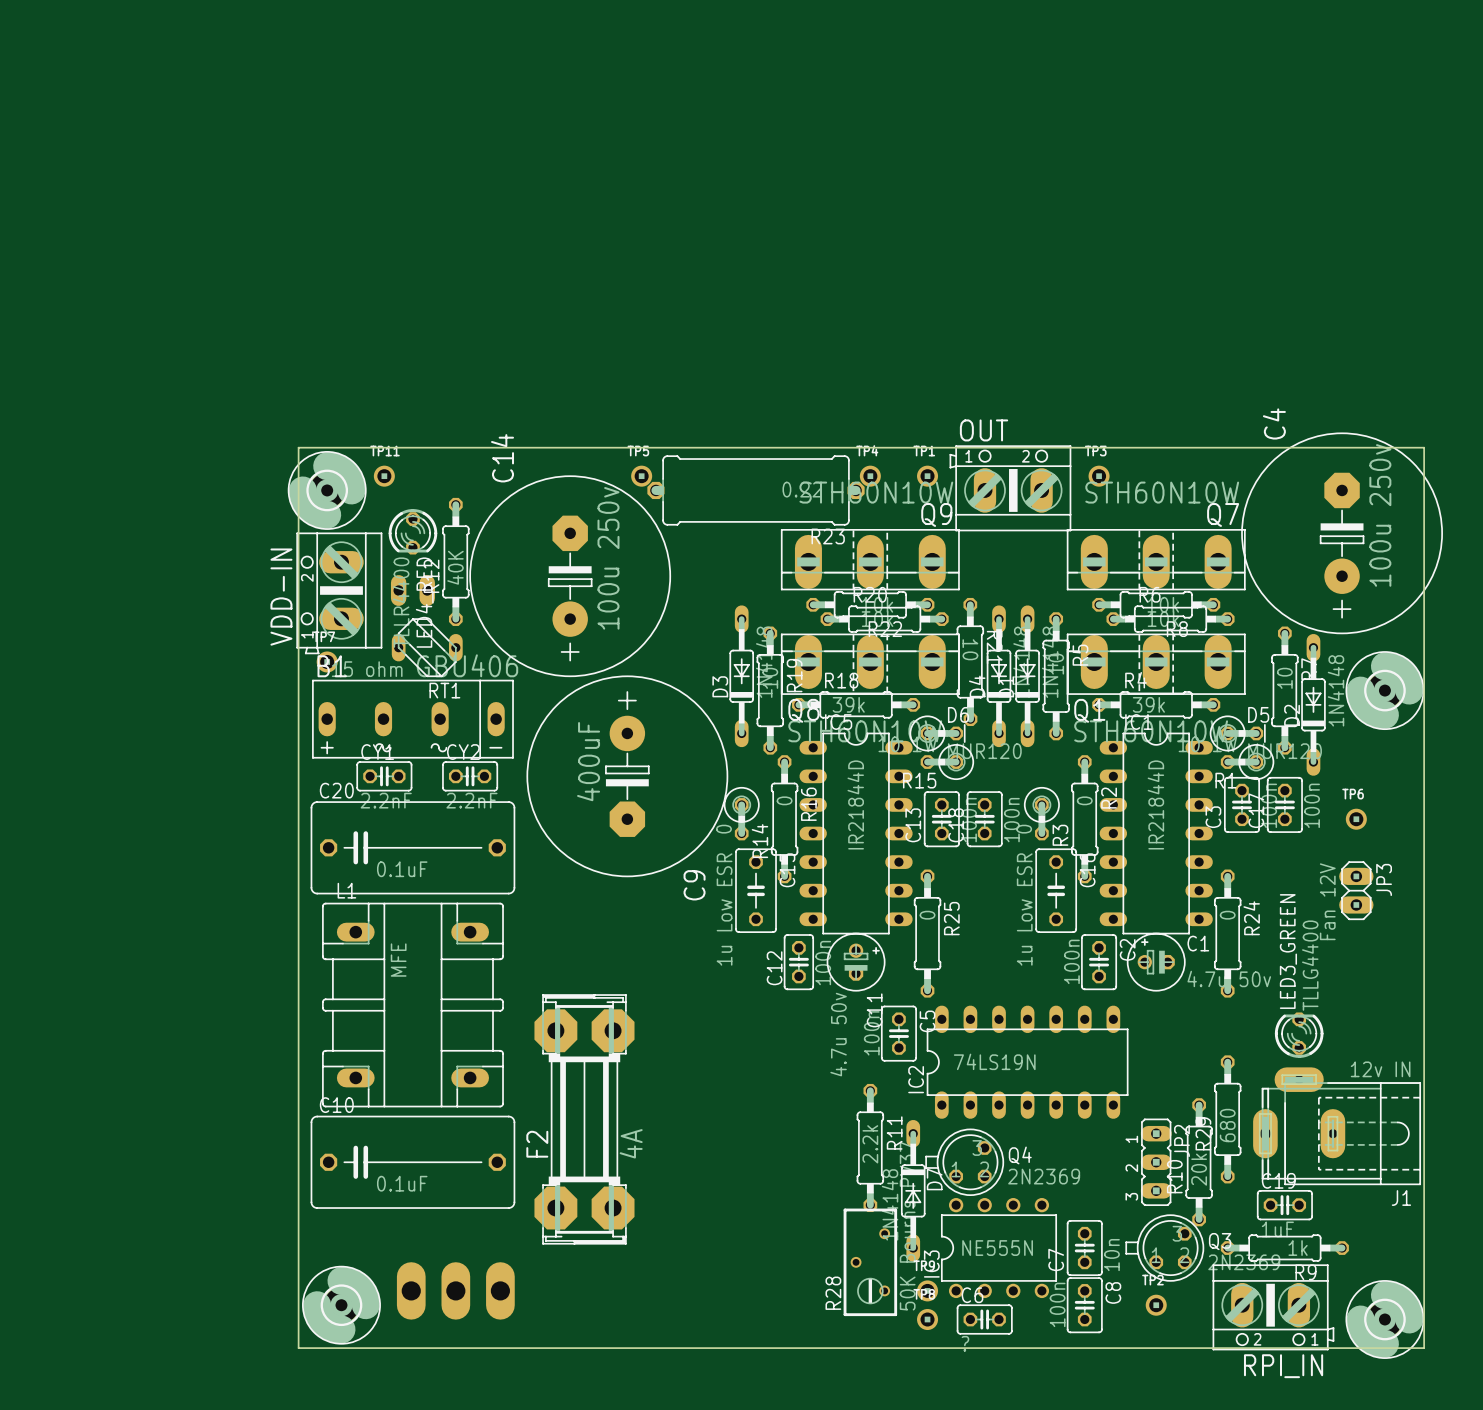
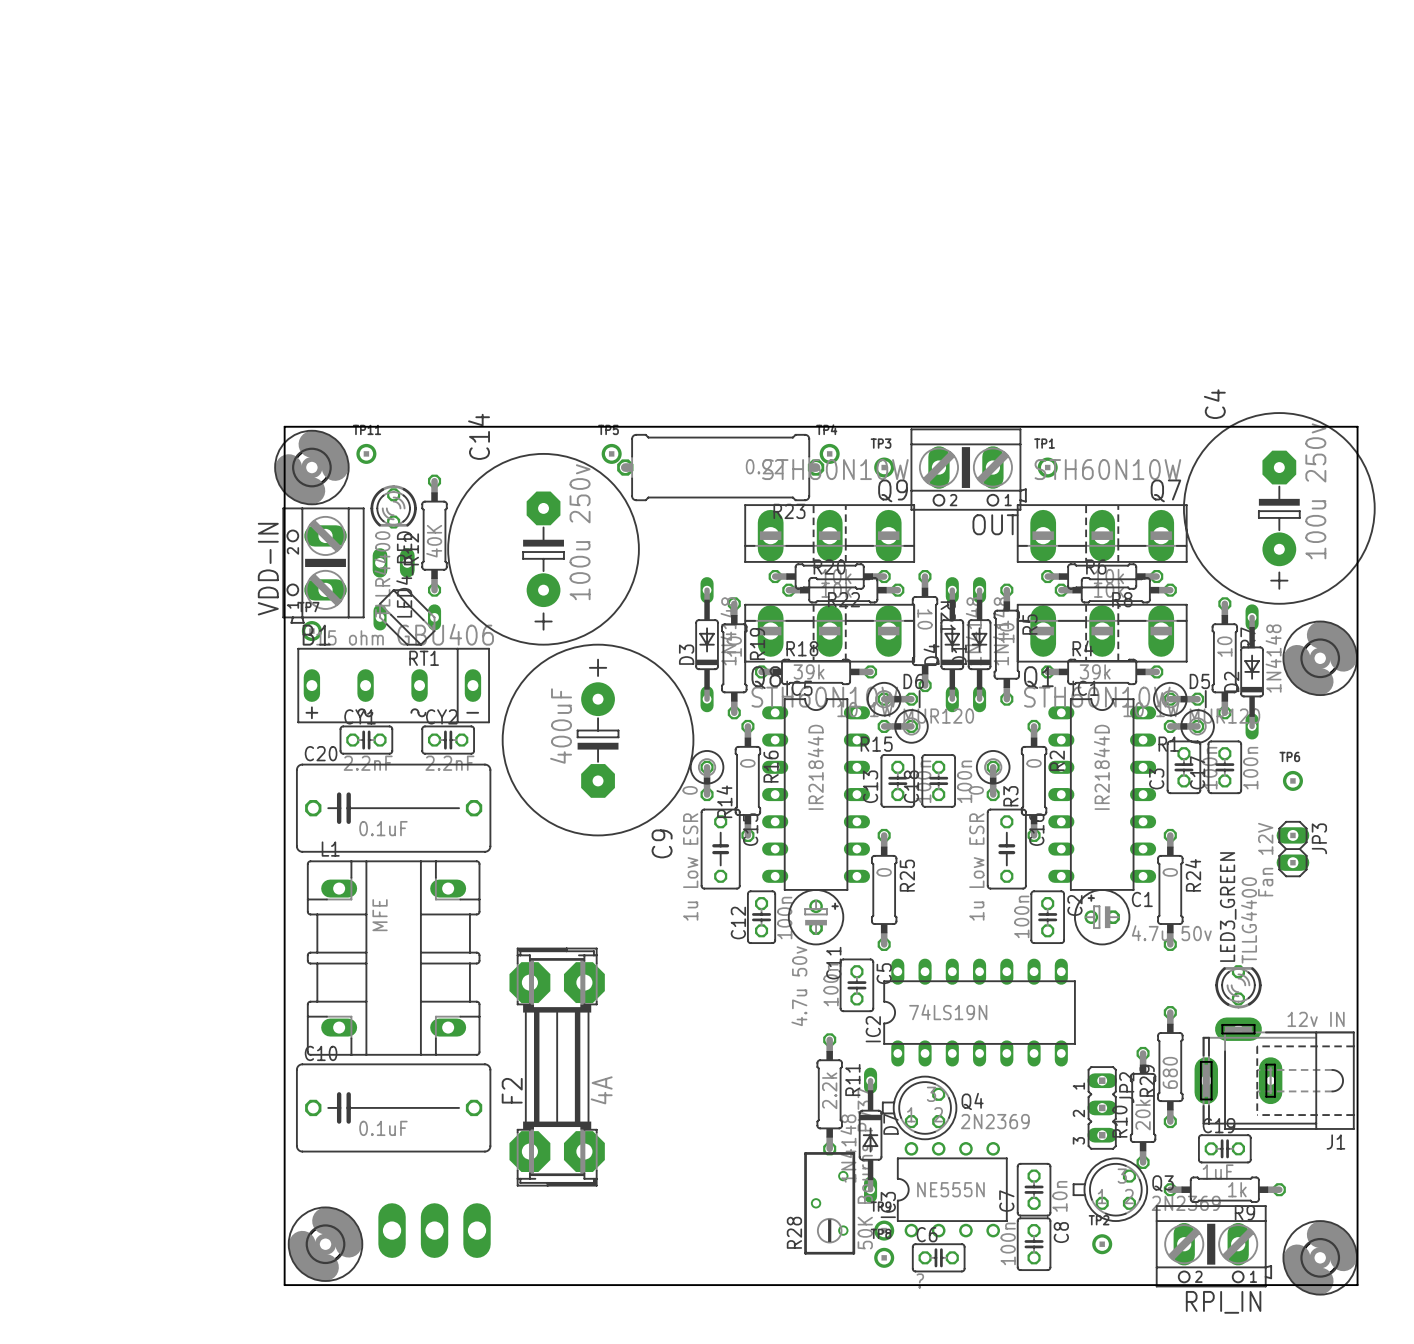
OUT name position: OUT (984, 430) -> OUT (995, 524)
OUT footprint: [949, 445, 1072, 532] -> [910, 428, 1027, 511]
TP1 position: (927, 476) -> (1047, 467)
TP3 position: (1099, 476) -> (884, 467)

